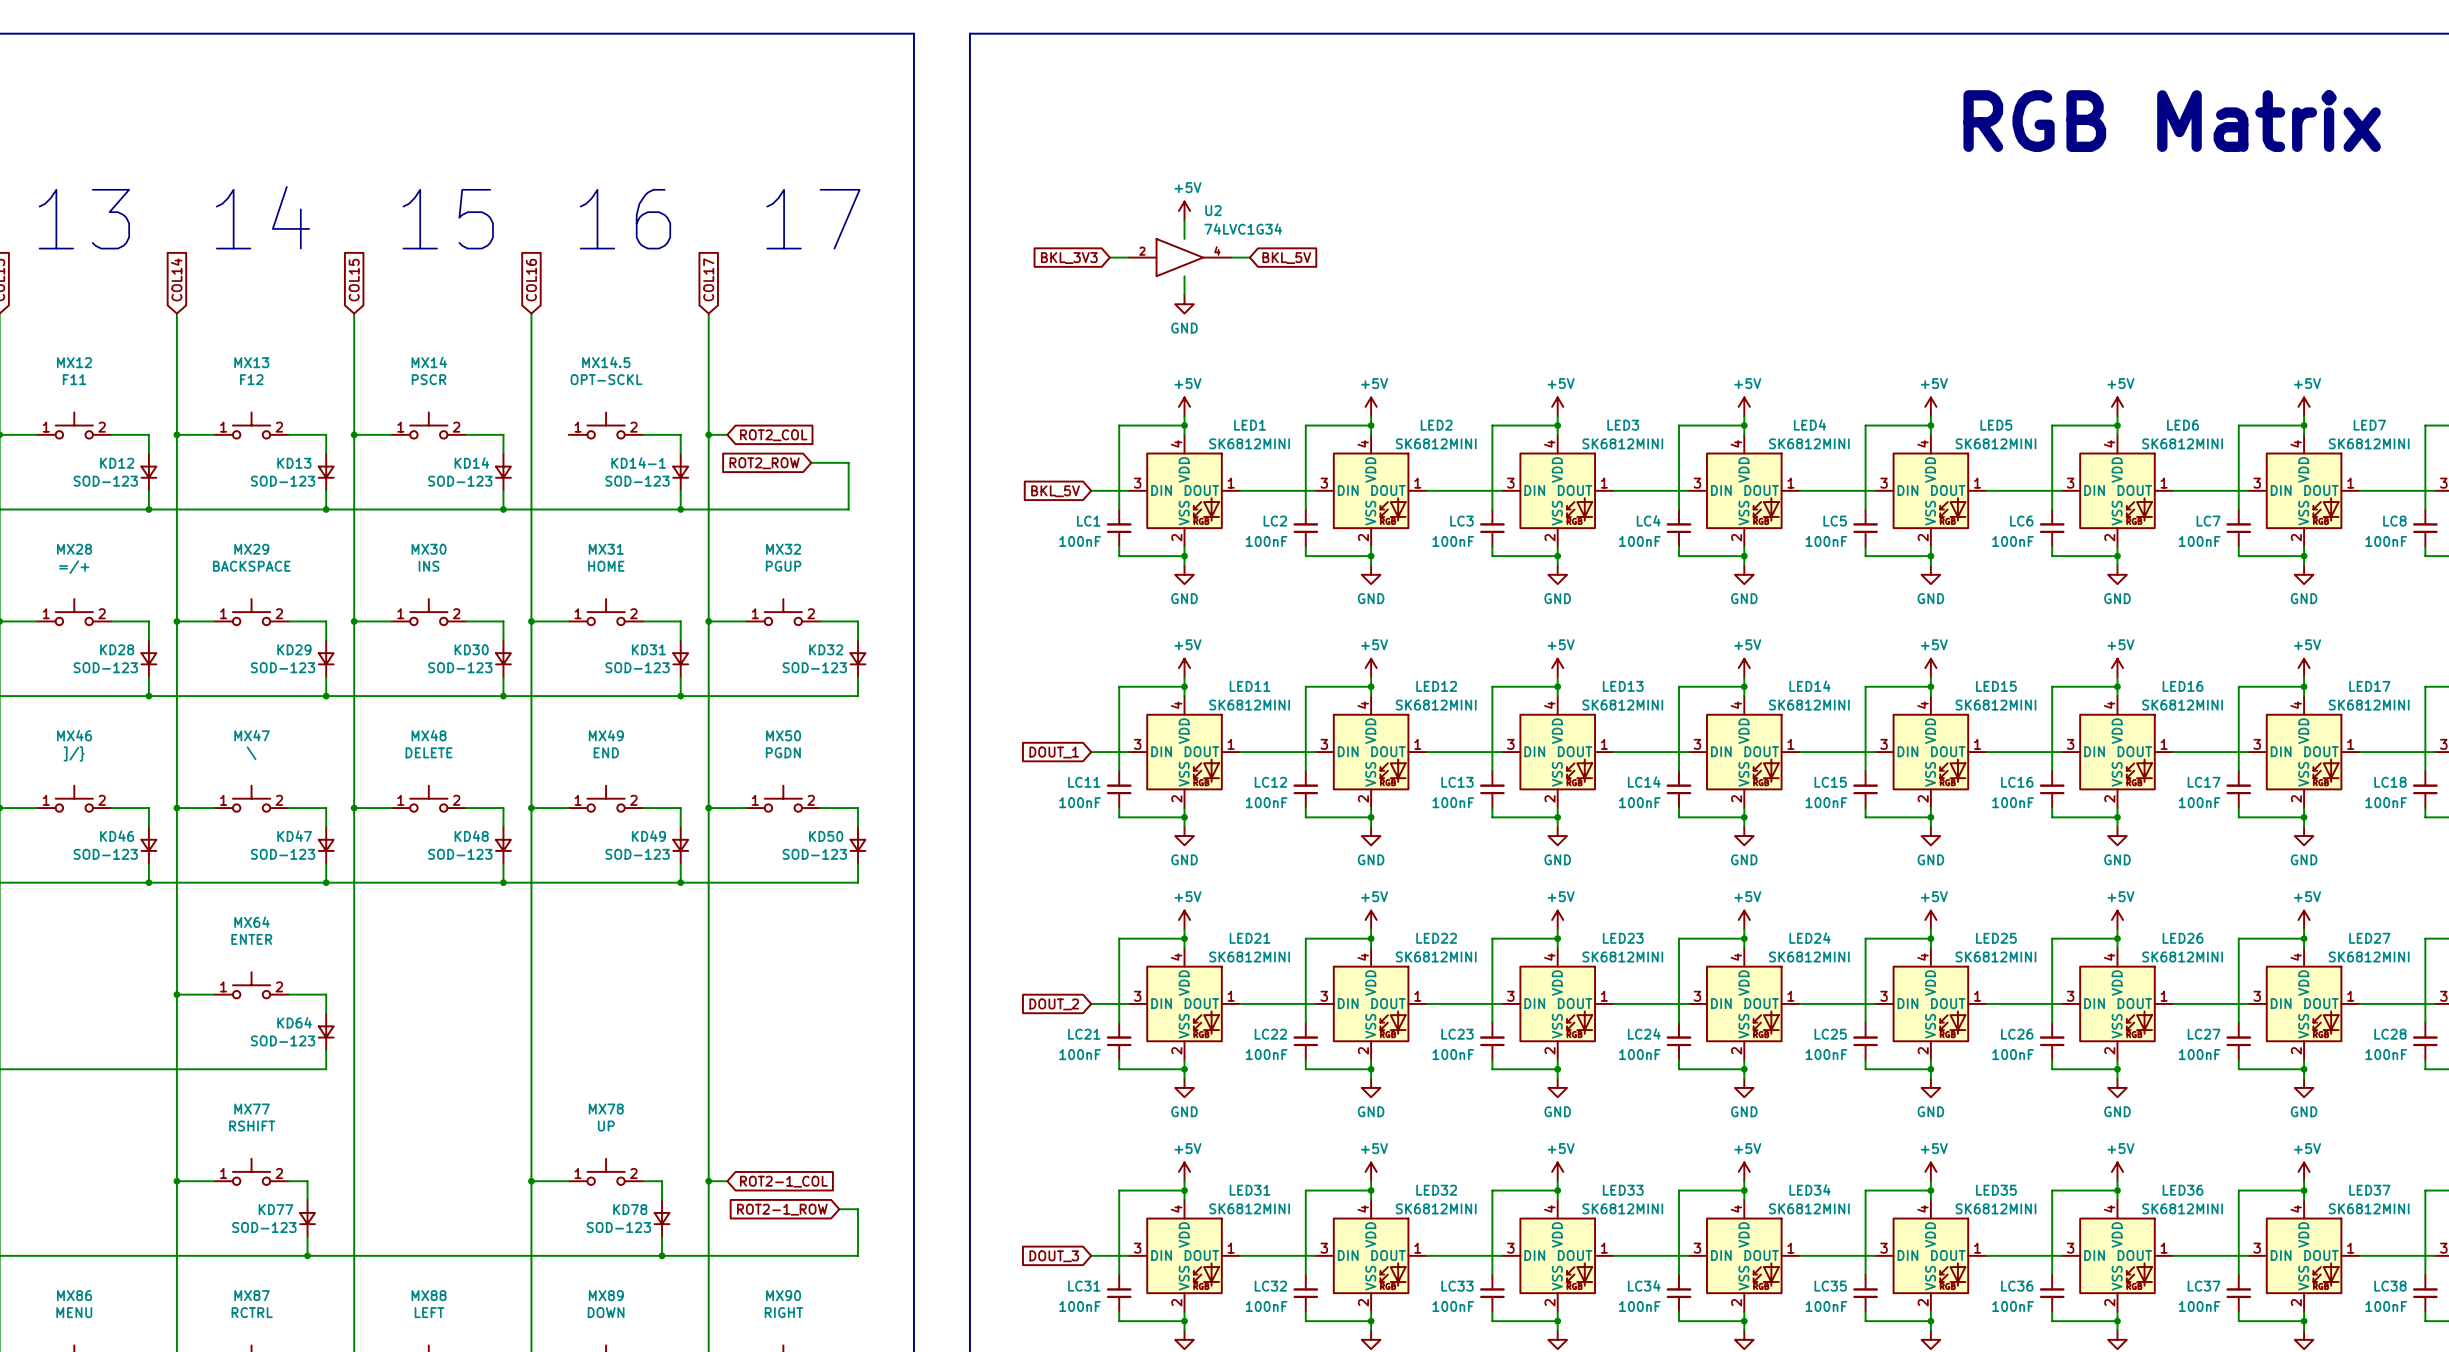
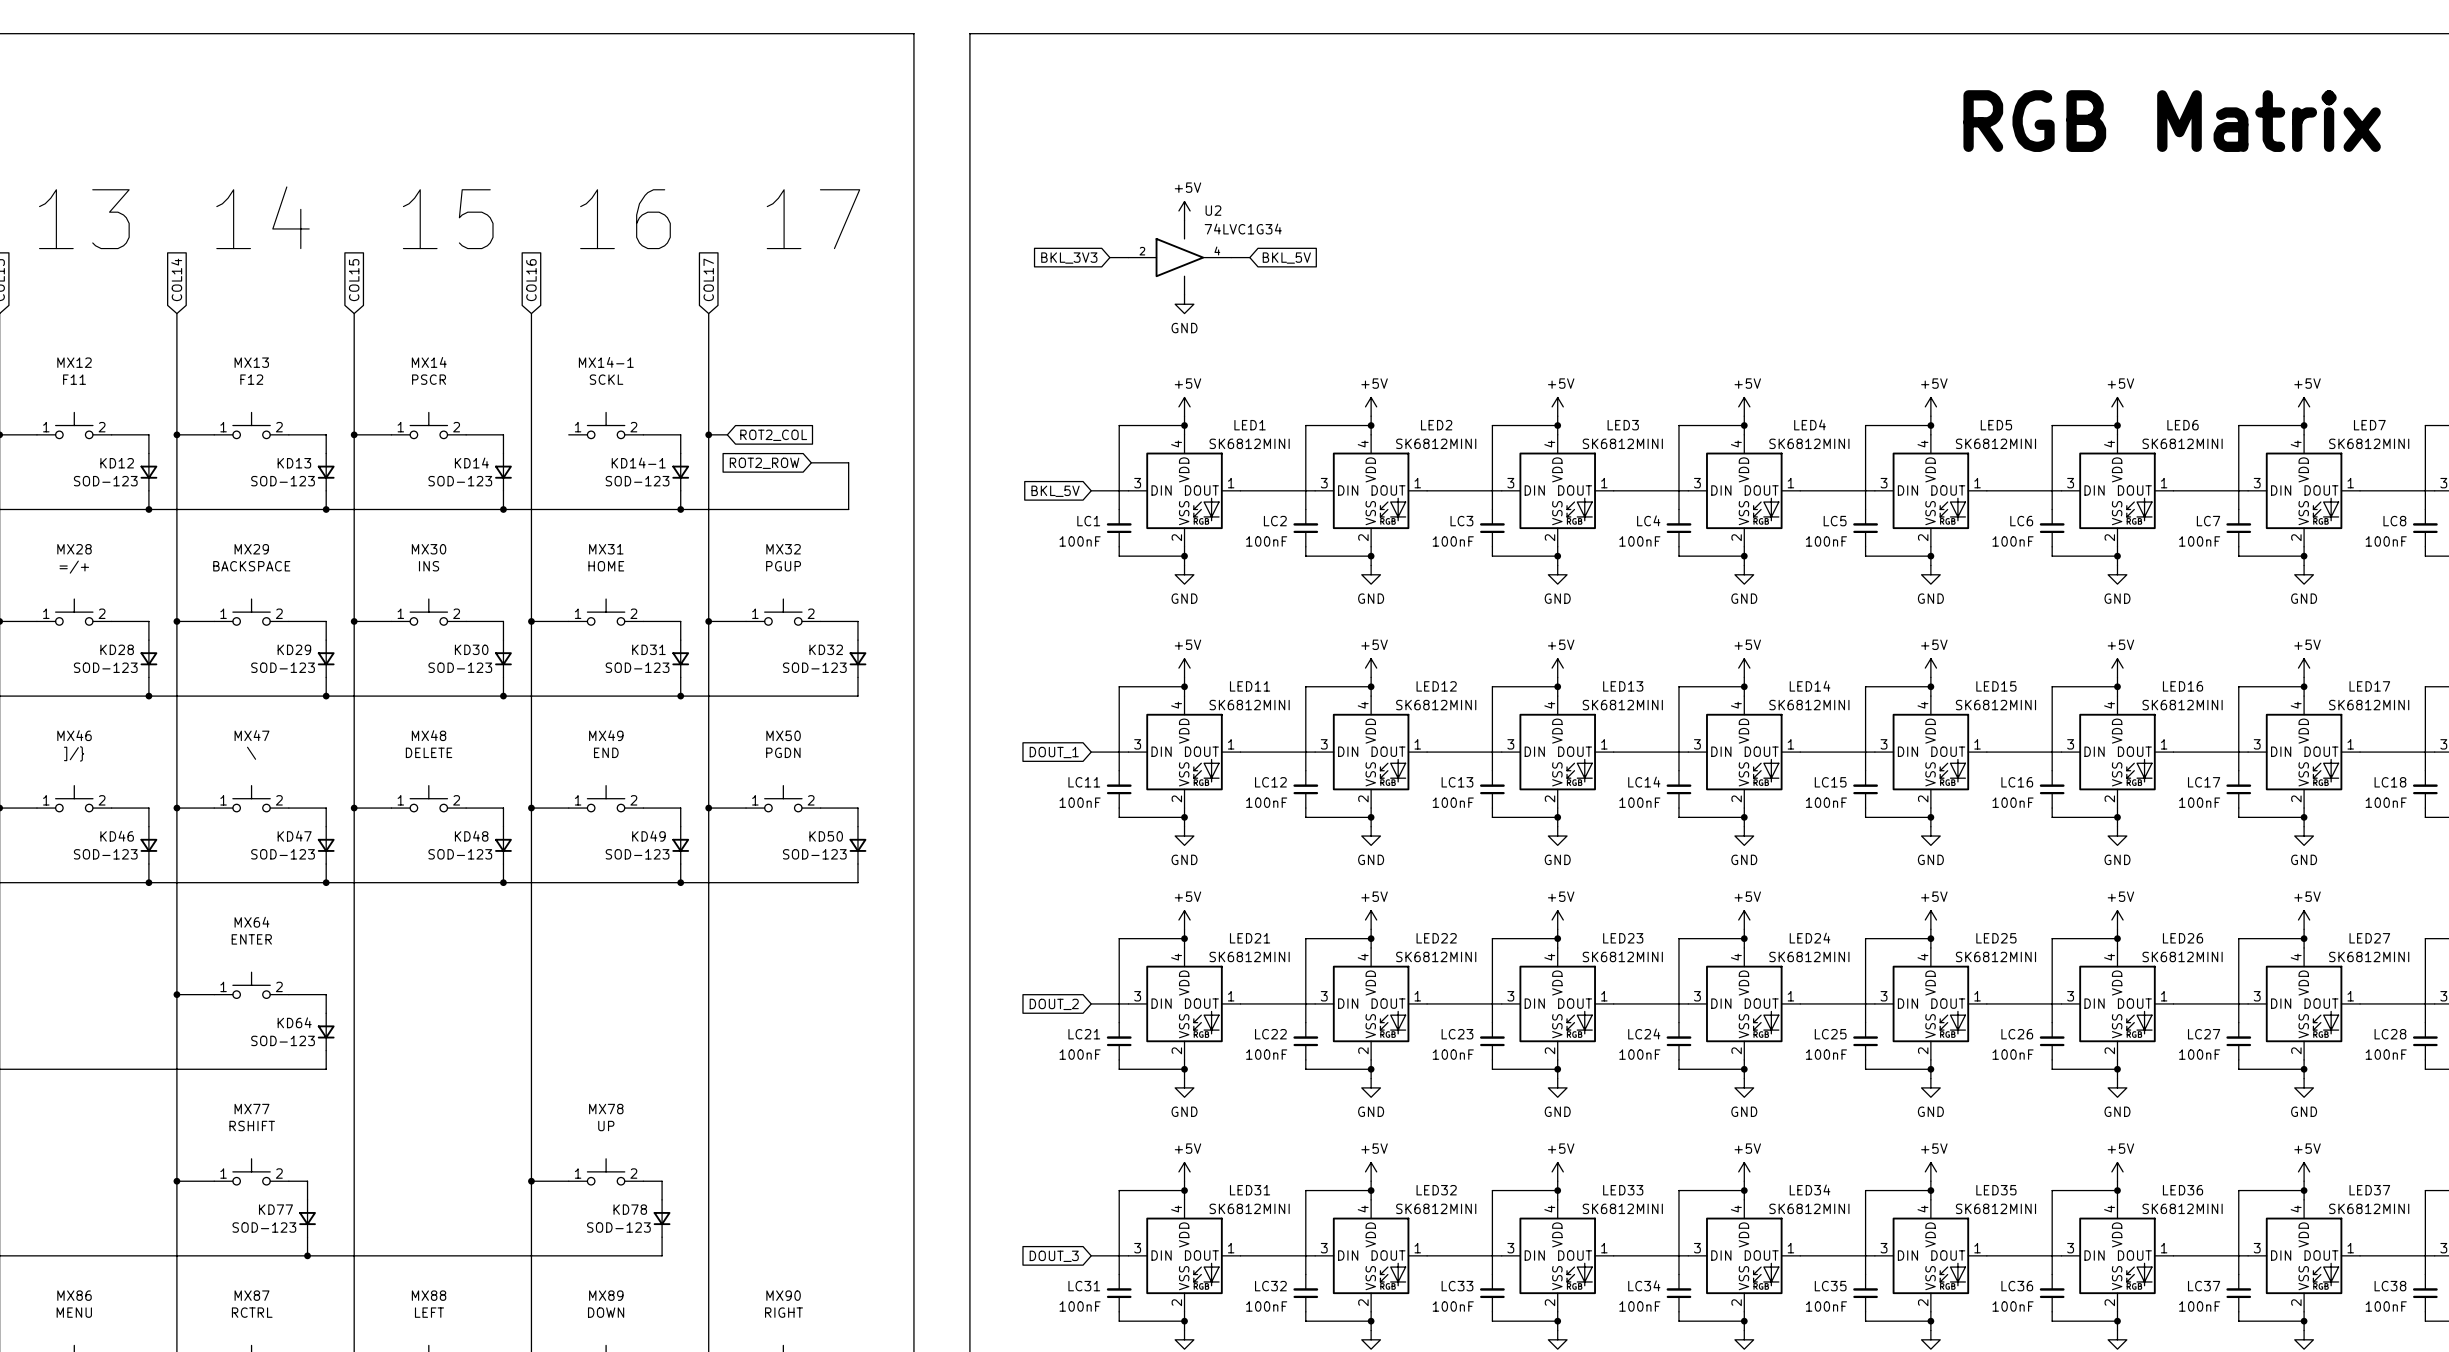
MX14.5 name: MX14.5 (606, 362) -> MX14-1 (606, 362)
MX14.5 value: OPT-SCKL (606, 379) -> SCKL (606, 379)
wire: (708, 1181) (727, 1181) -> none
junction: (708, 1181) -> none
global label: ROT2-1_COL (783, 1181) -> none
global label: ROT2-1_ROW (782, 1209) -> none
wire: (839, 1209) (857, 1209) (857, 1255) (662, 1255) -> none
junction: (662, 1255) -> none

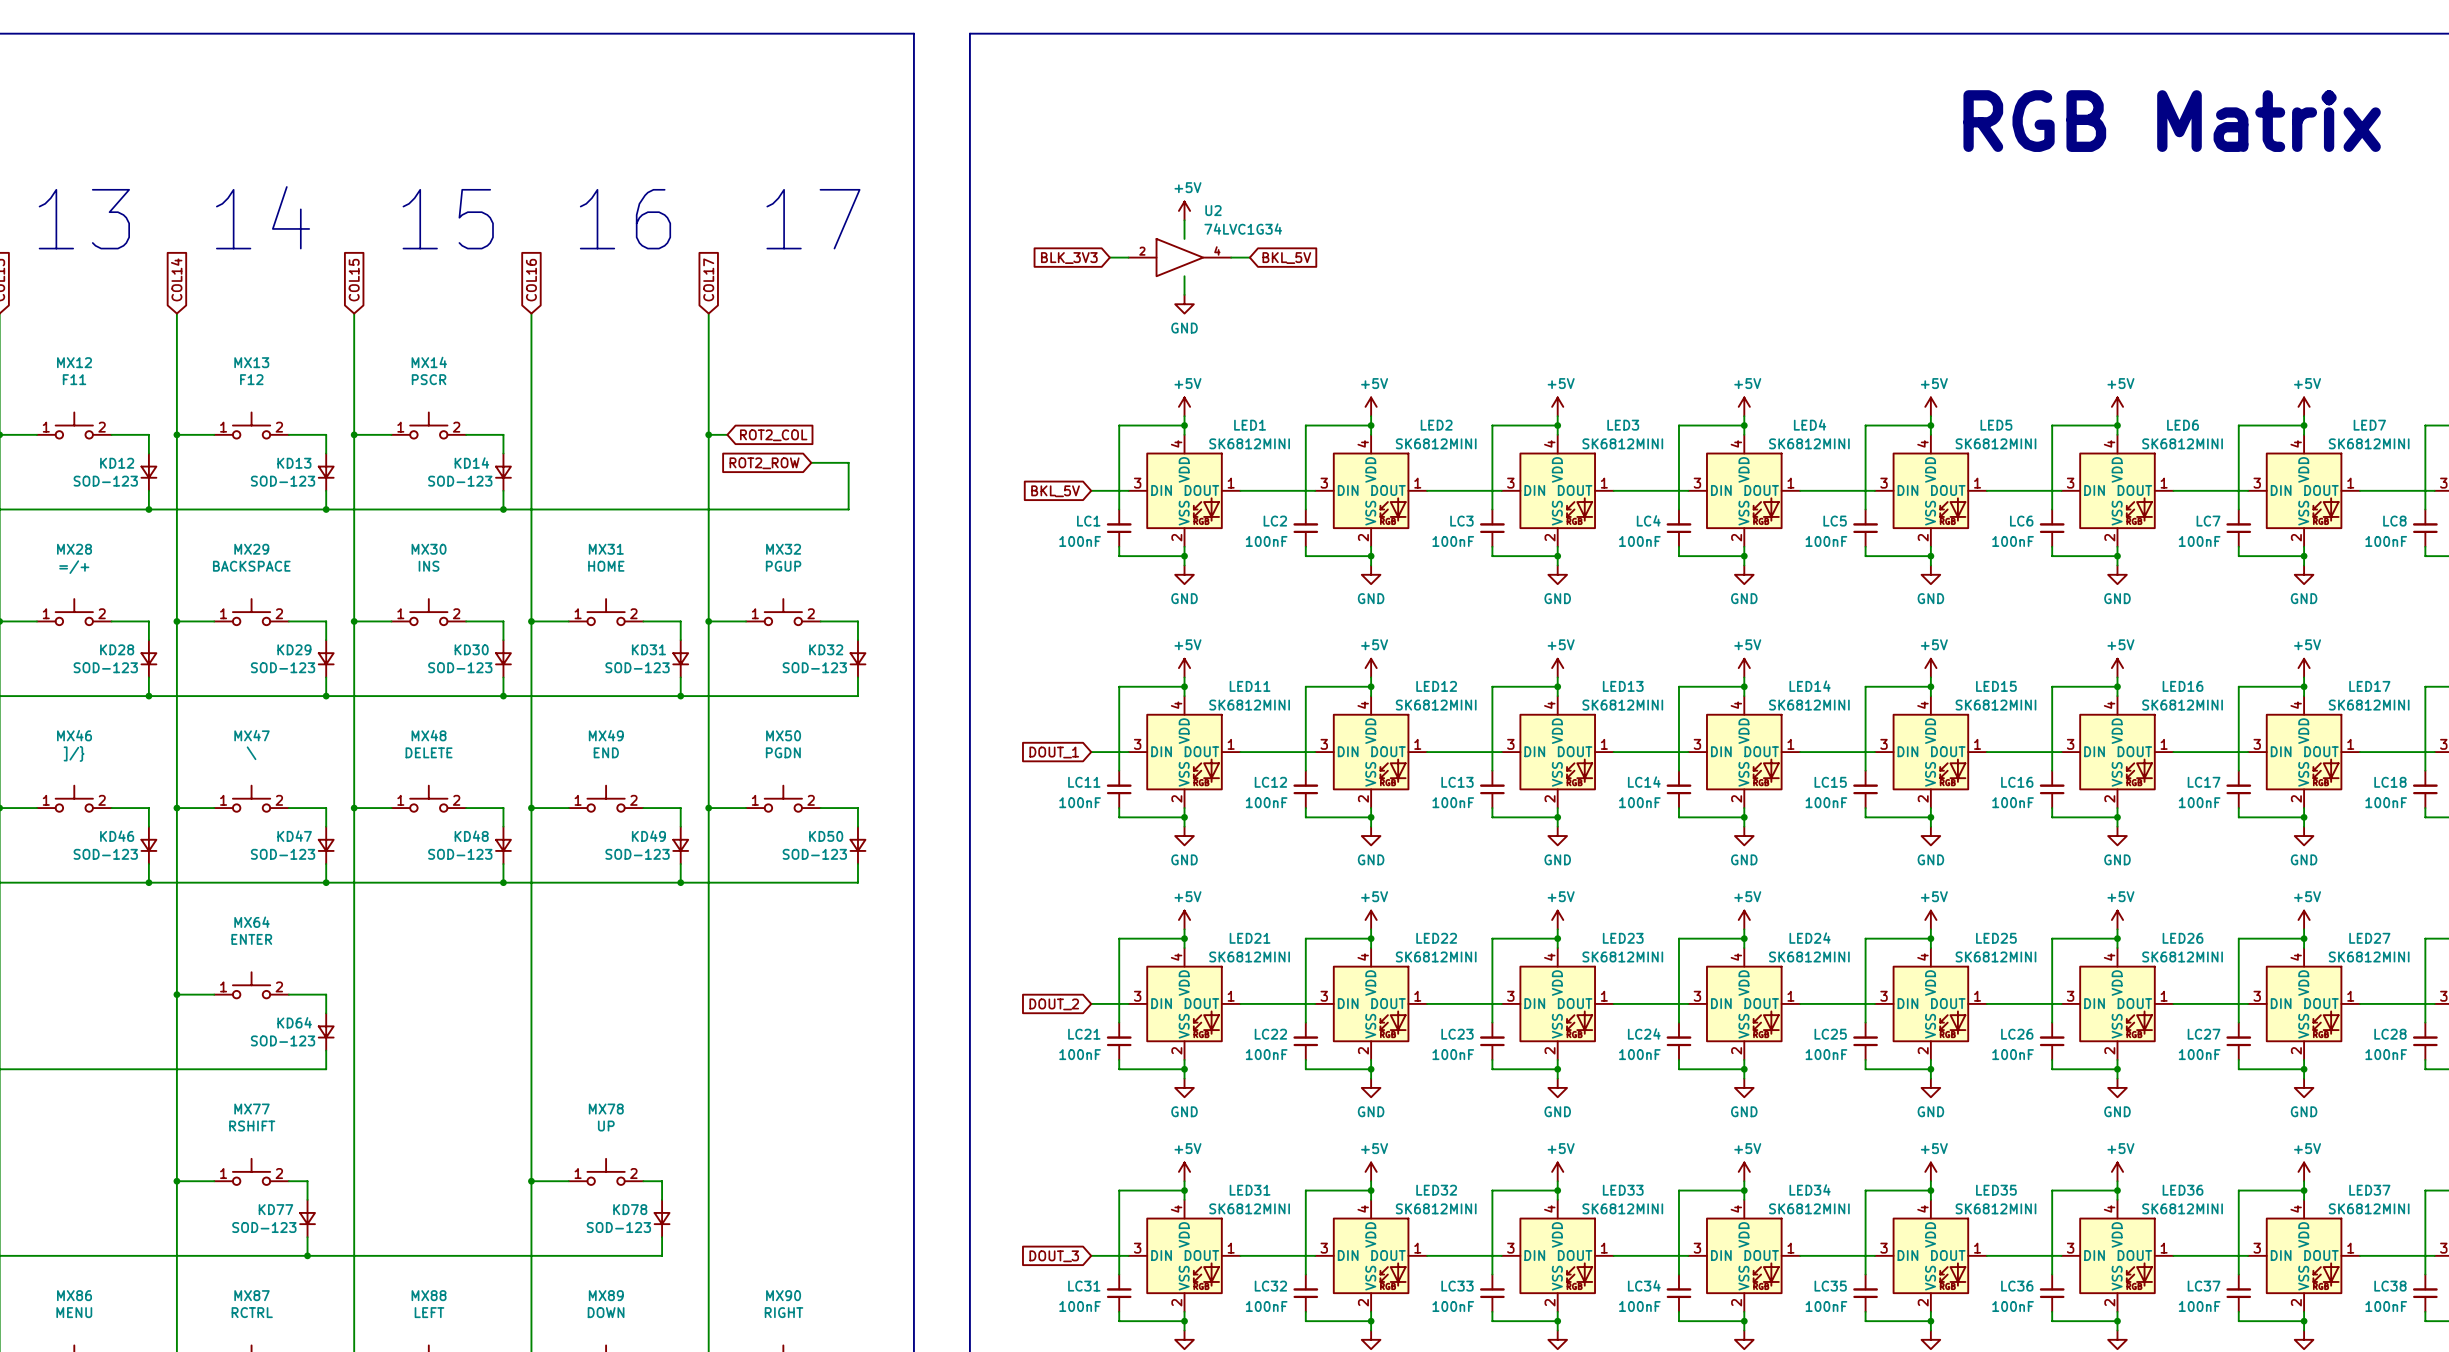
global label: BKL_3V3 (1069, 258) -> BLK_3V3 (1069, 258)
MX14-1: SCKL (606, 425) -> none
wire: (643, 434) (680, 434) (680, 453) -> none
KD14-1: SOD-123 (680, 472) -> none
wire: (680, 490) (680, 509) -> none
junction: (680, 509) -> none

